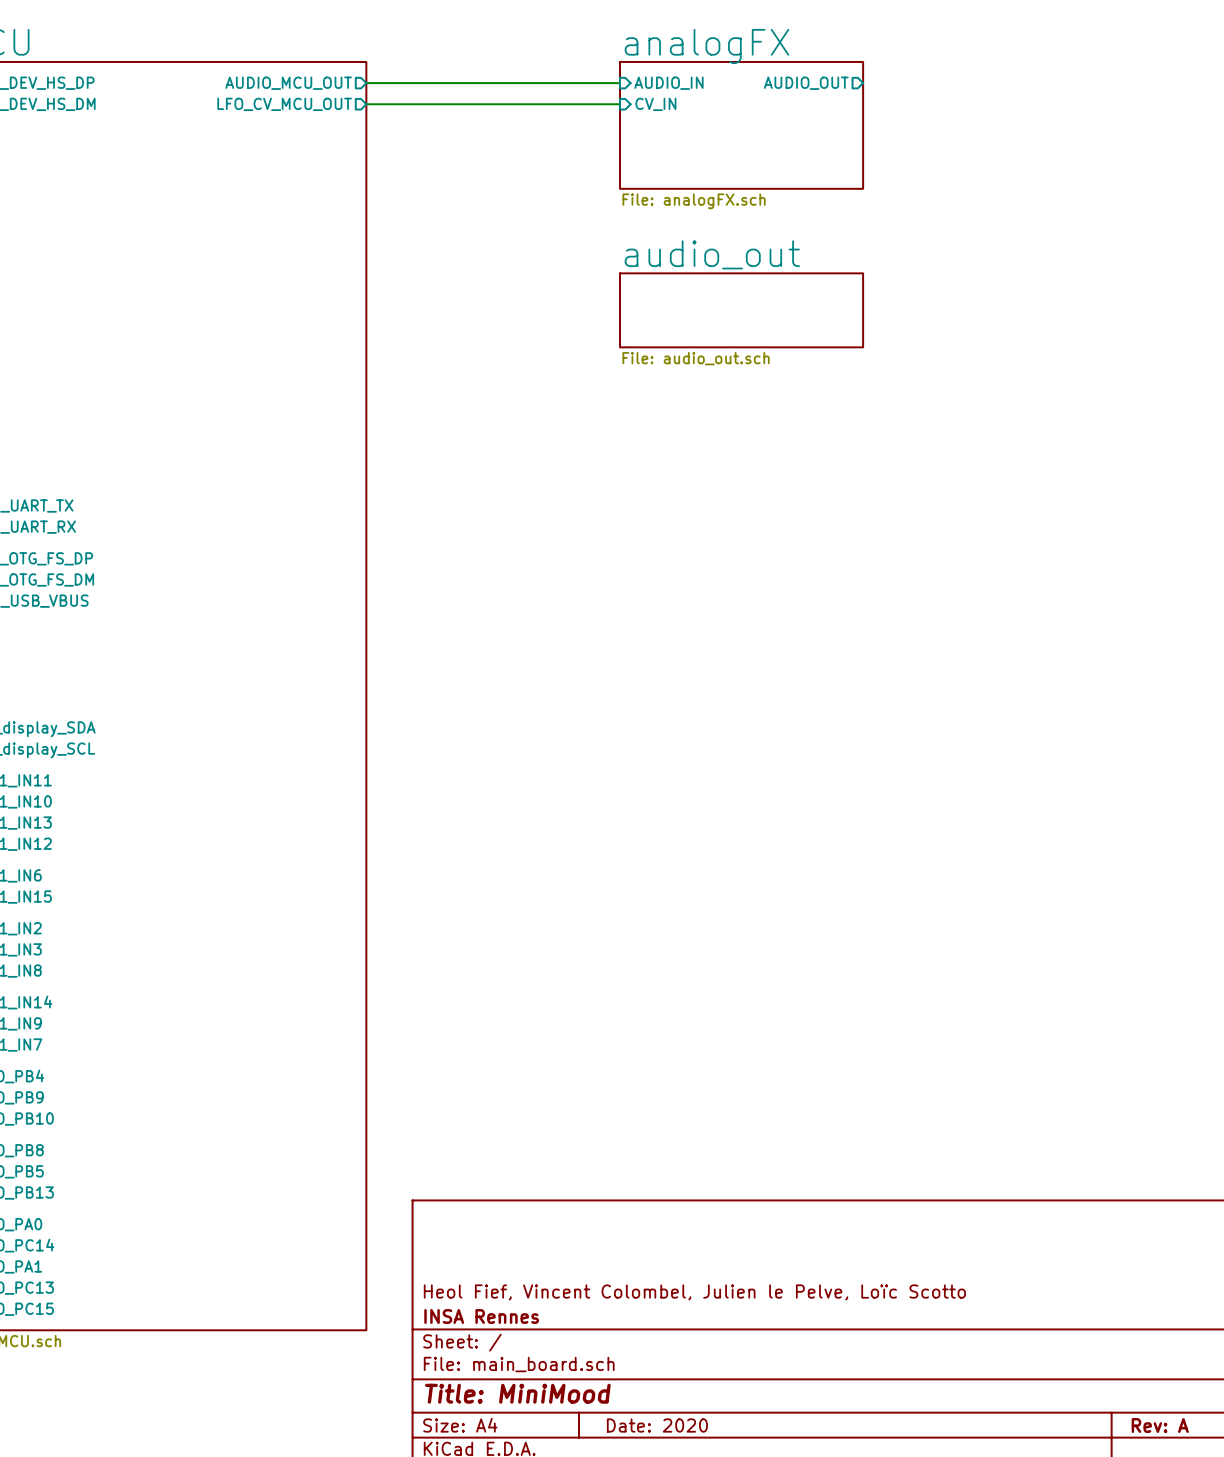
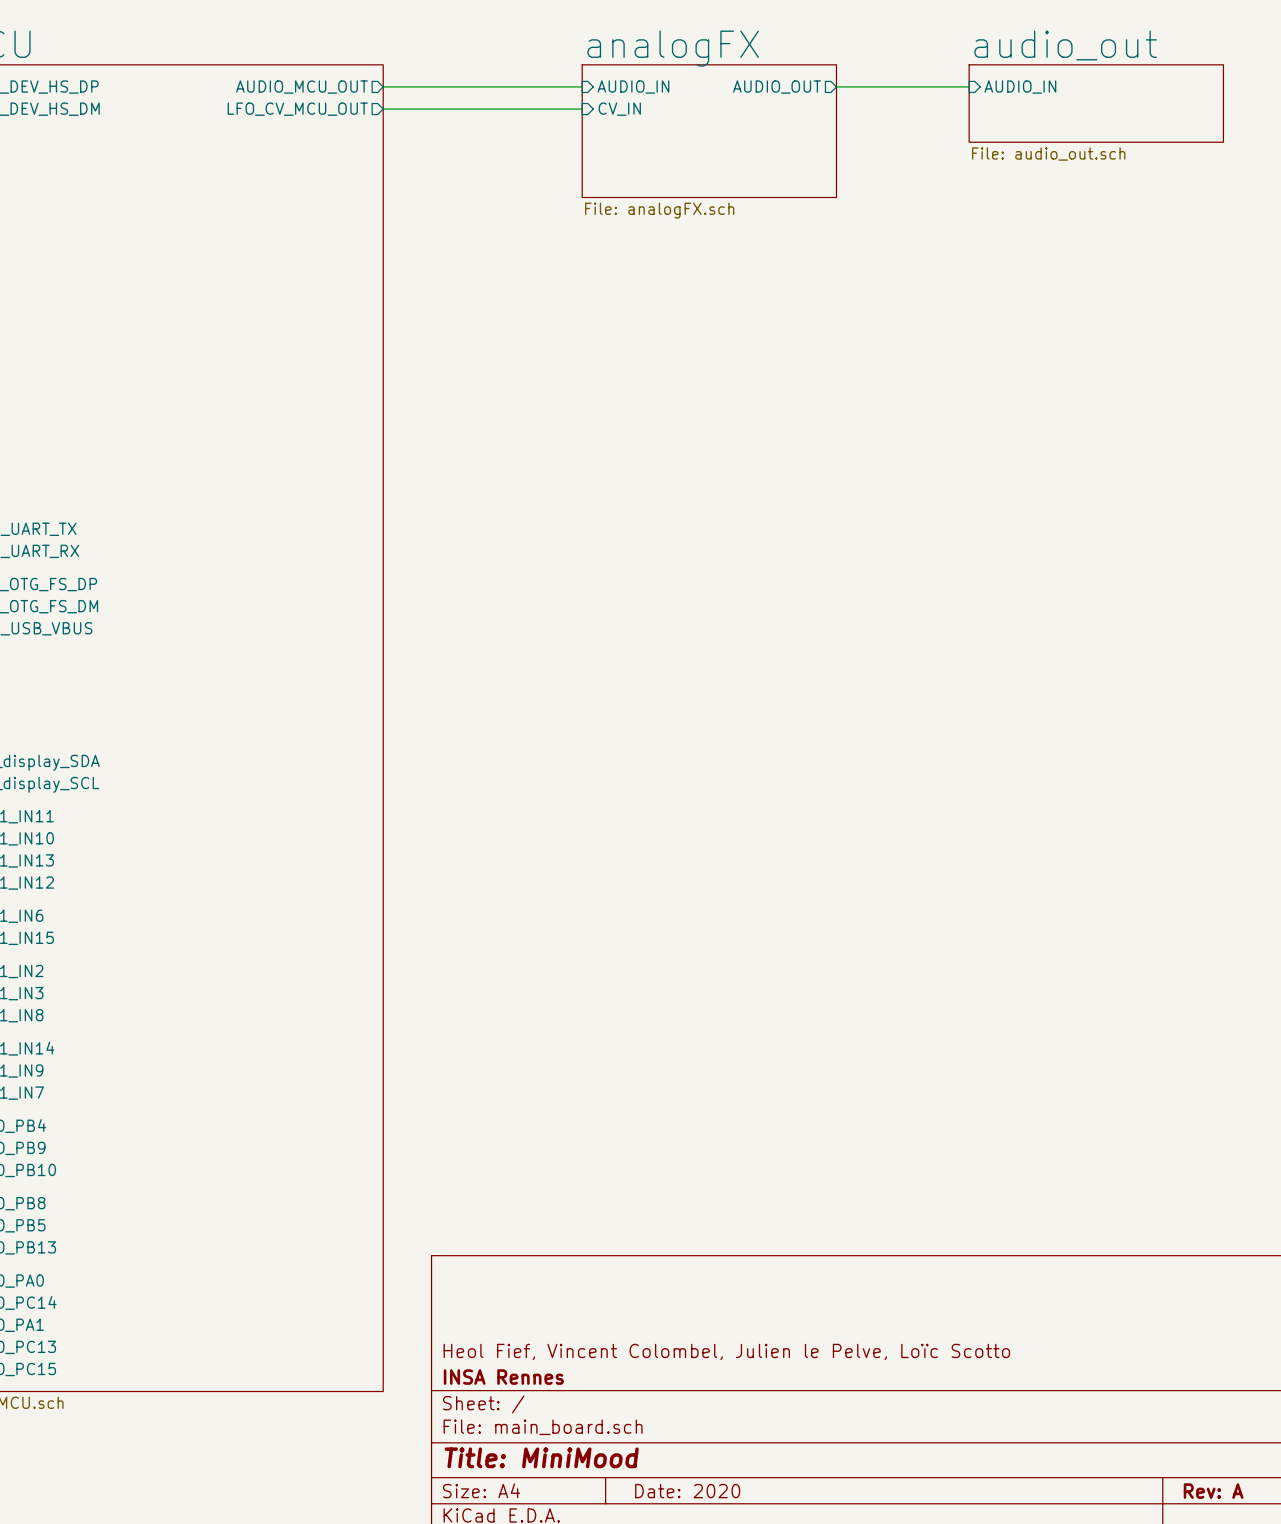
wire: (556, 83) (620, 83) -> none
sheet pin position: AUDIO_IN (669, 83) -> AUDIO_IN (633, 87)
wire: none -> (836, 86) (969, 86)
sheet pin position: AUDIO_OUT (806, 83) -> AUDIO_OUT (777, 87)
sheet pin: none -> AUDIO_IN (1020, 87)
sheet audio_out: none -> File: audio_out.sch (1096, 103)
wire: (556, 104) (620, 104) -> none
sheet pin position: CV_IN (655, 104) -> CV_IN (619, 109)
sheet analogFX position: (741, 125) -> (709, 131)
sheet audio_out: File: audio_out.sch (741, 310) -> none

